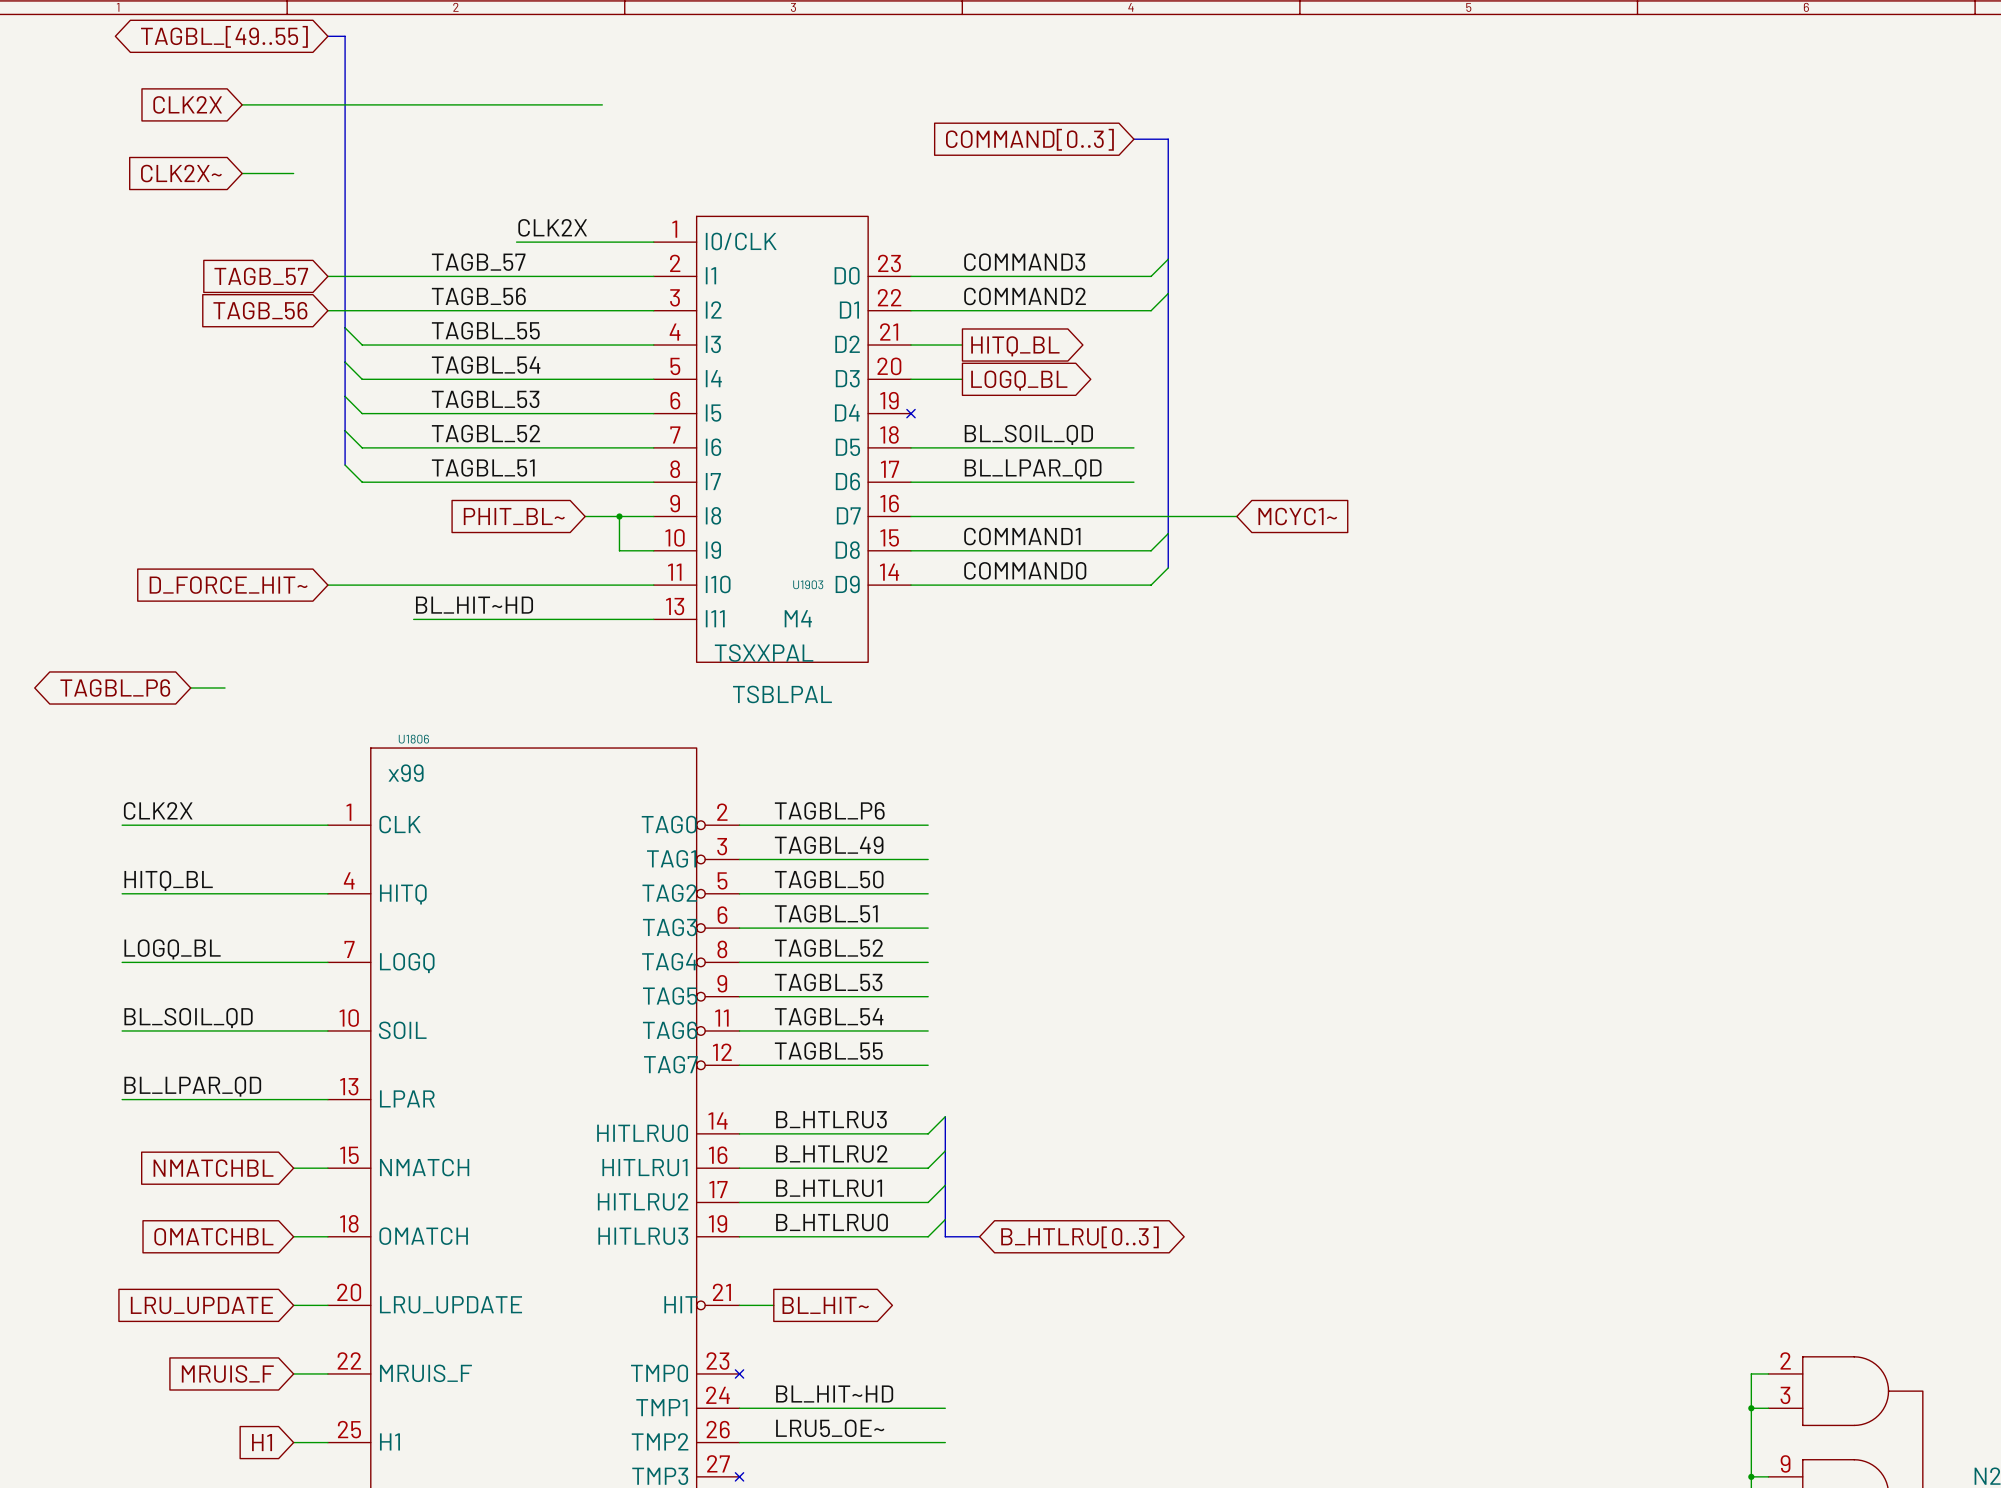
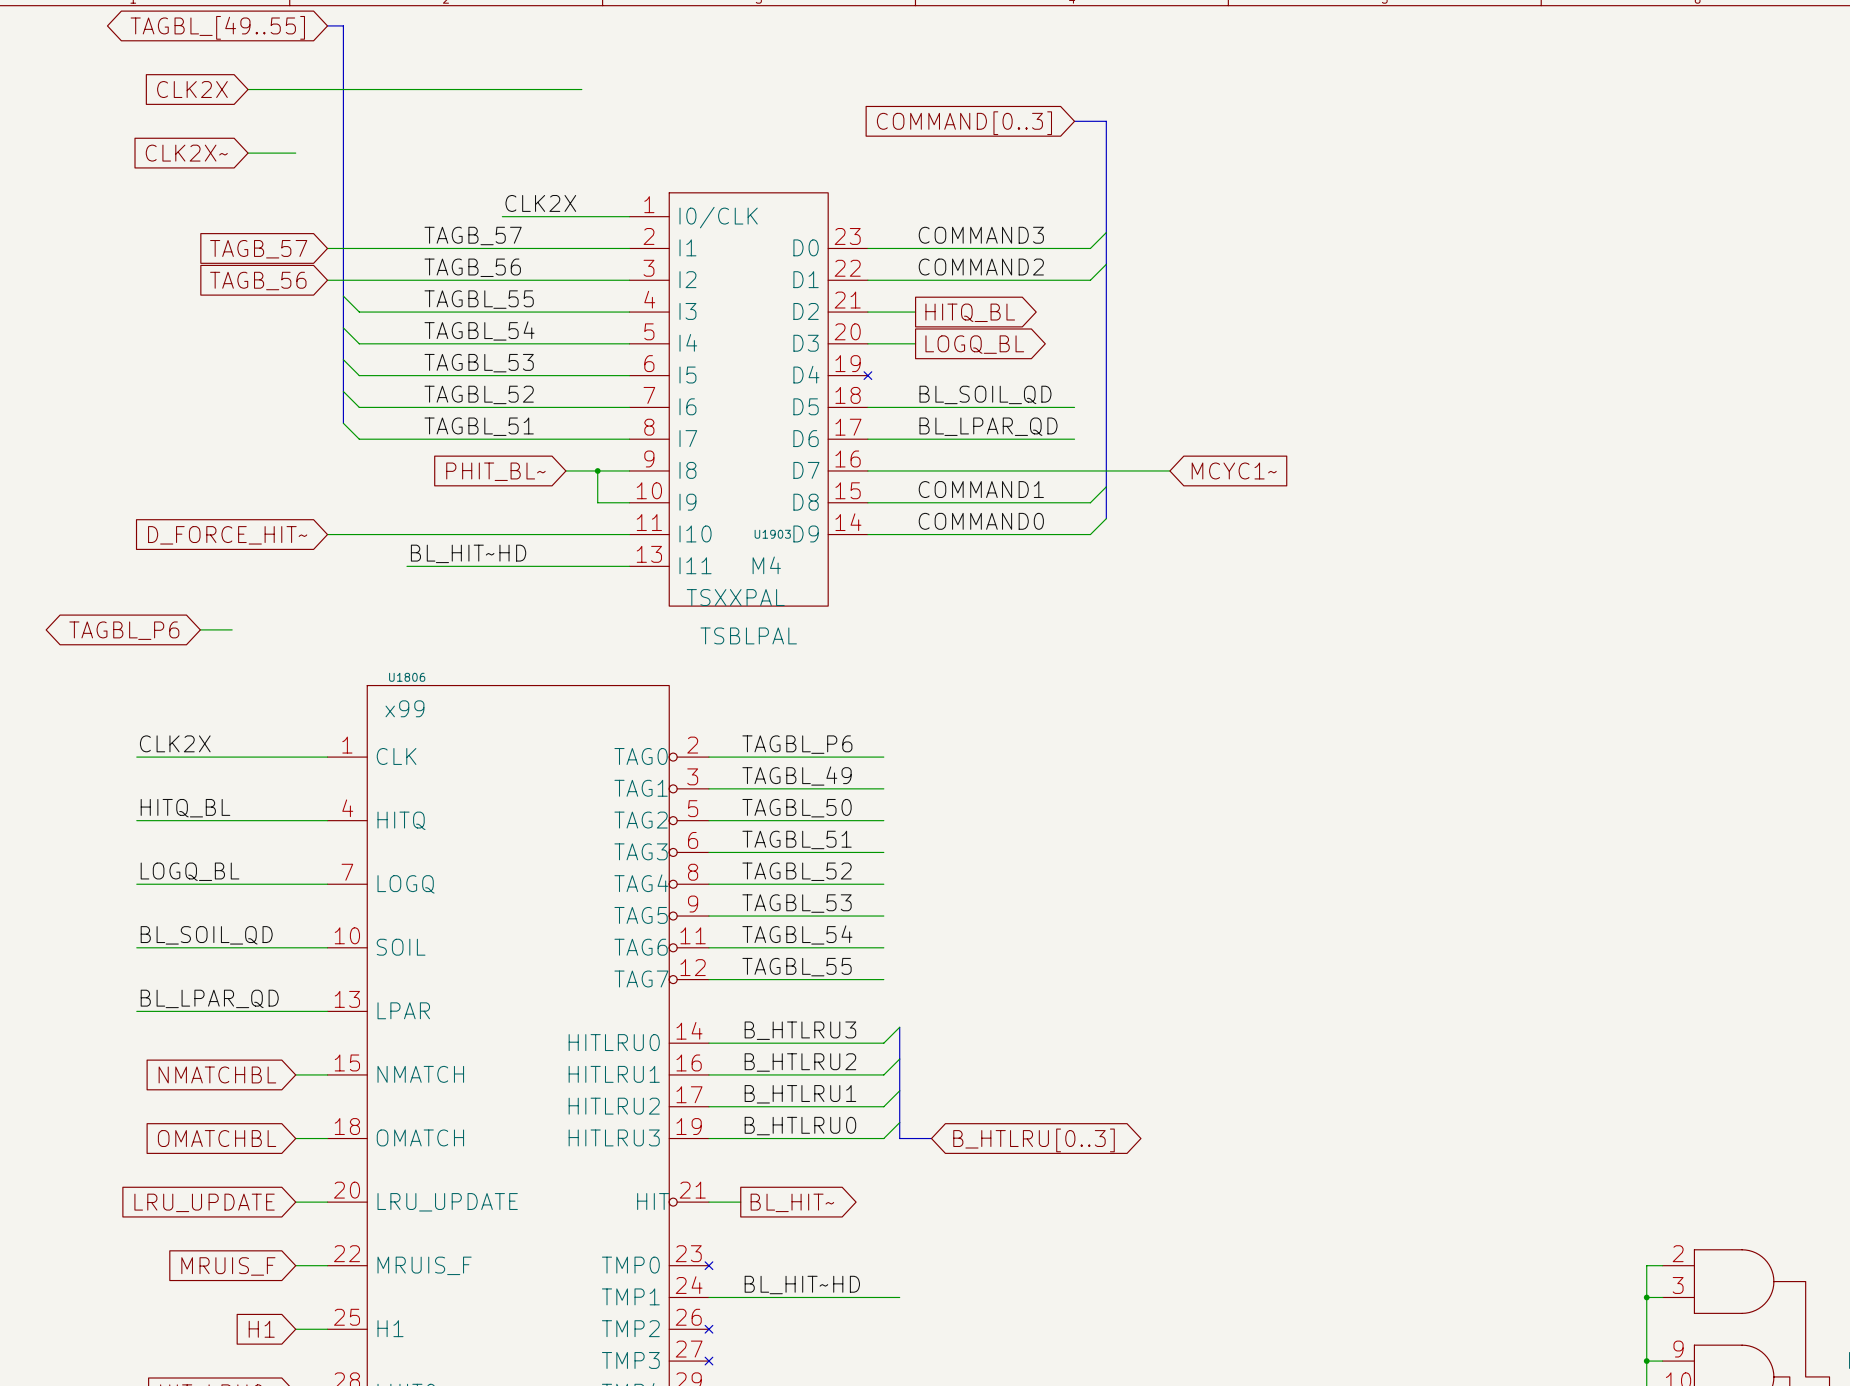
label: LRU5_OE~ (830, 1428) -> none
wire: (739, 1442) (945, 1442) -> none
no-connect mark: none -> (708, 1329)

